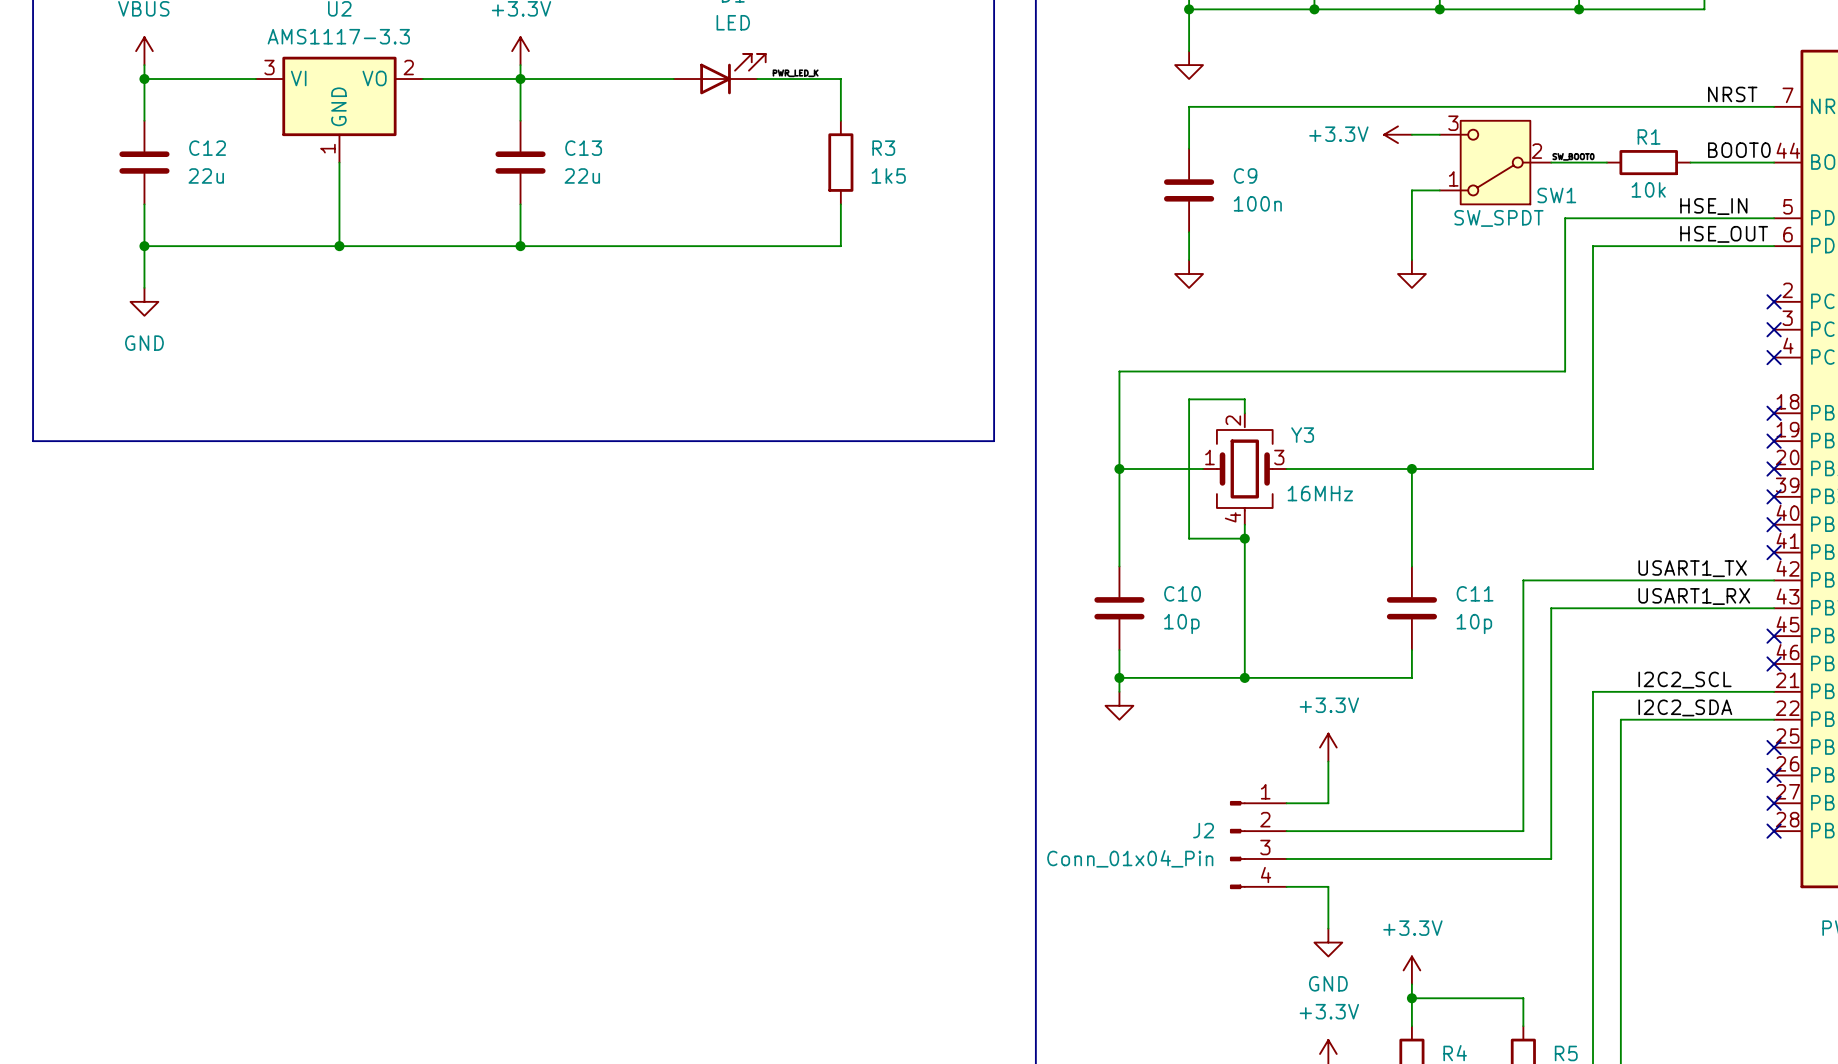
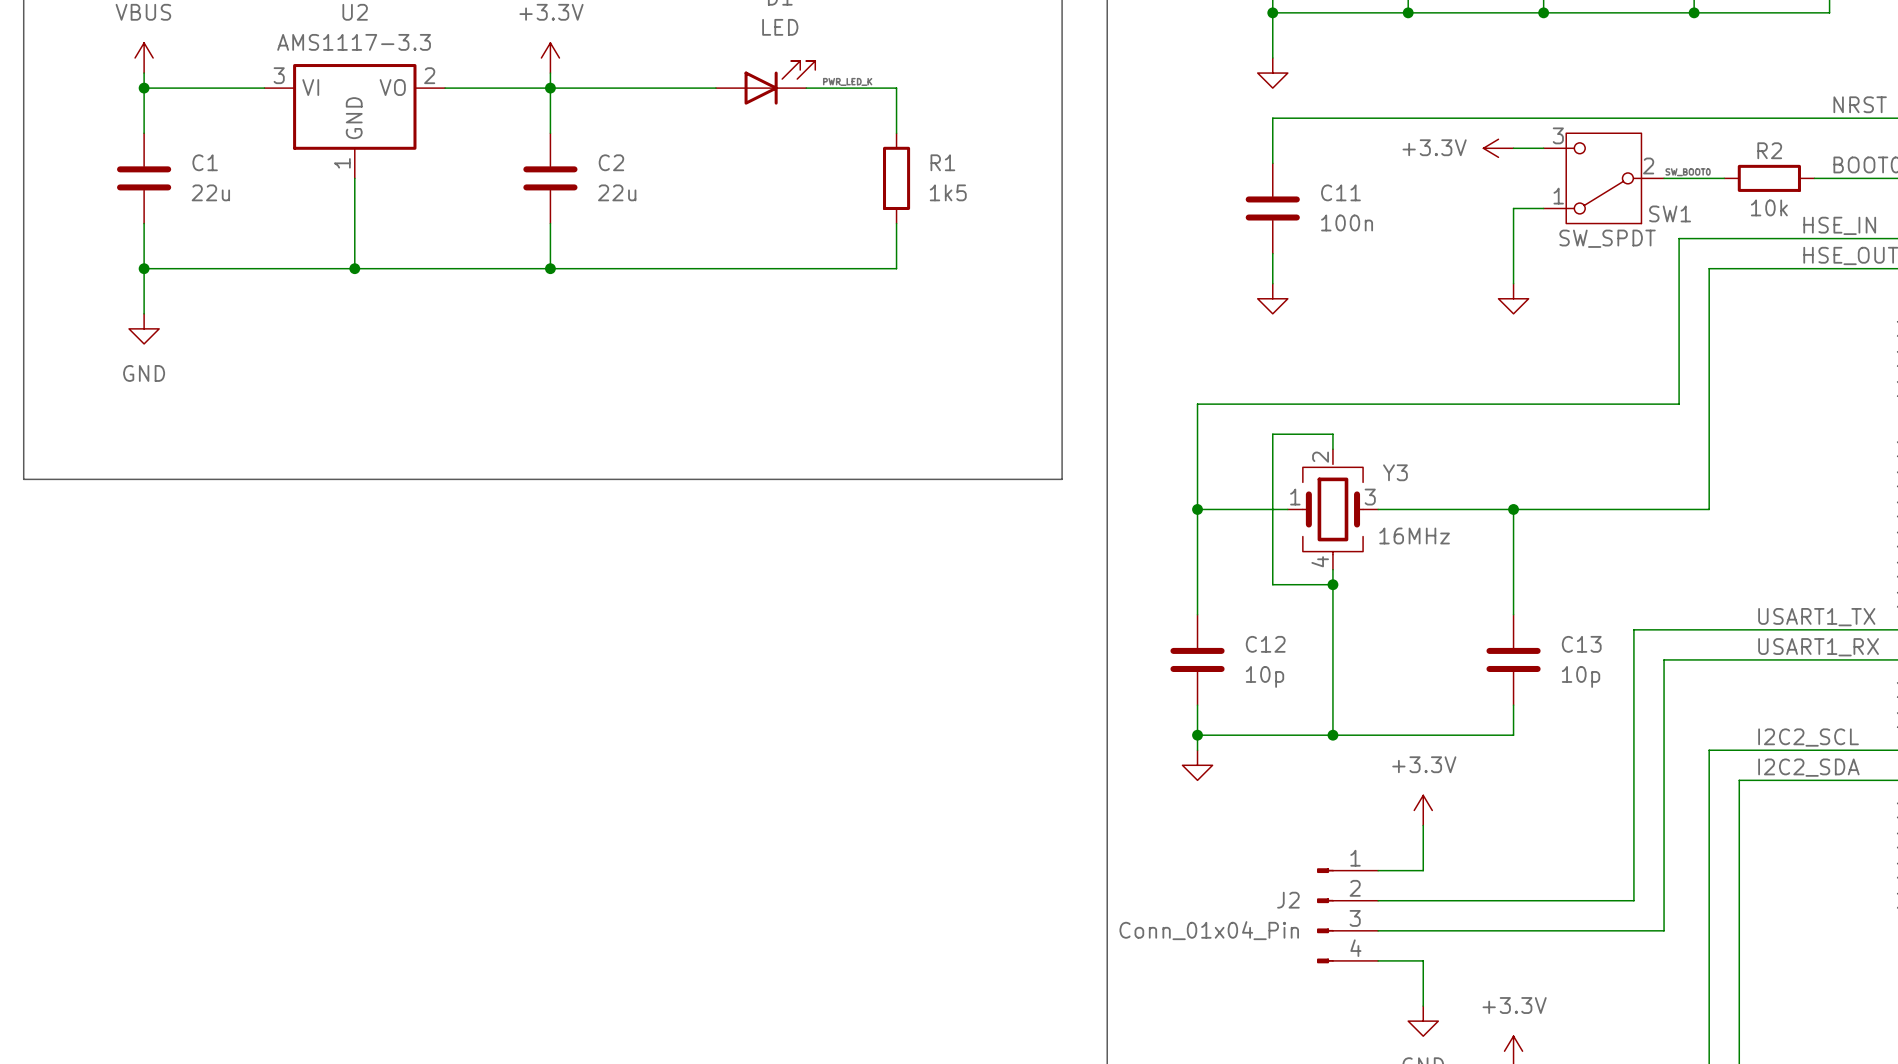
R1 name: R1 (1649, 136) -> R2 (1769, 150)
C12 name: C12 (207, 148) -> C1 (205, 162)
C13 name: C13 (583, 148) -> C2 (611, 162)
R3 name: R3 (883, 148) -> R1 (942, 162)
C9 name: C9 (1245, 175) -> C11 (1340, 192)
C10 name: C10 (1182, 593) -> C12 (1265, 644)
C11 name: C11 (1475, 593) -> C13 (1581, 644)

